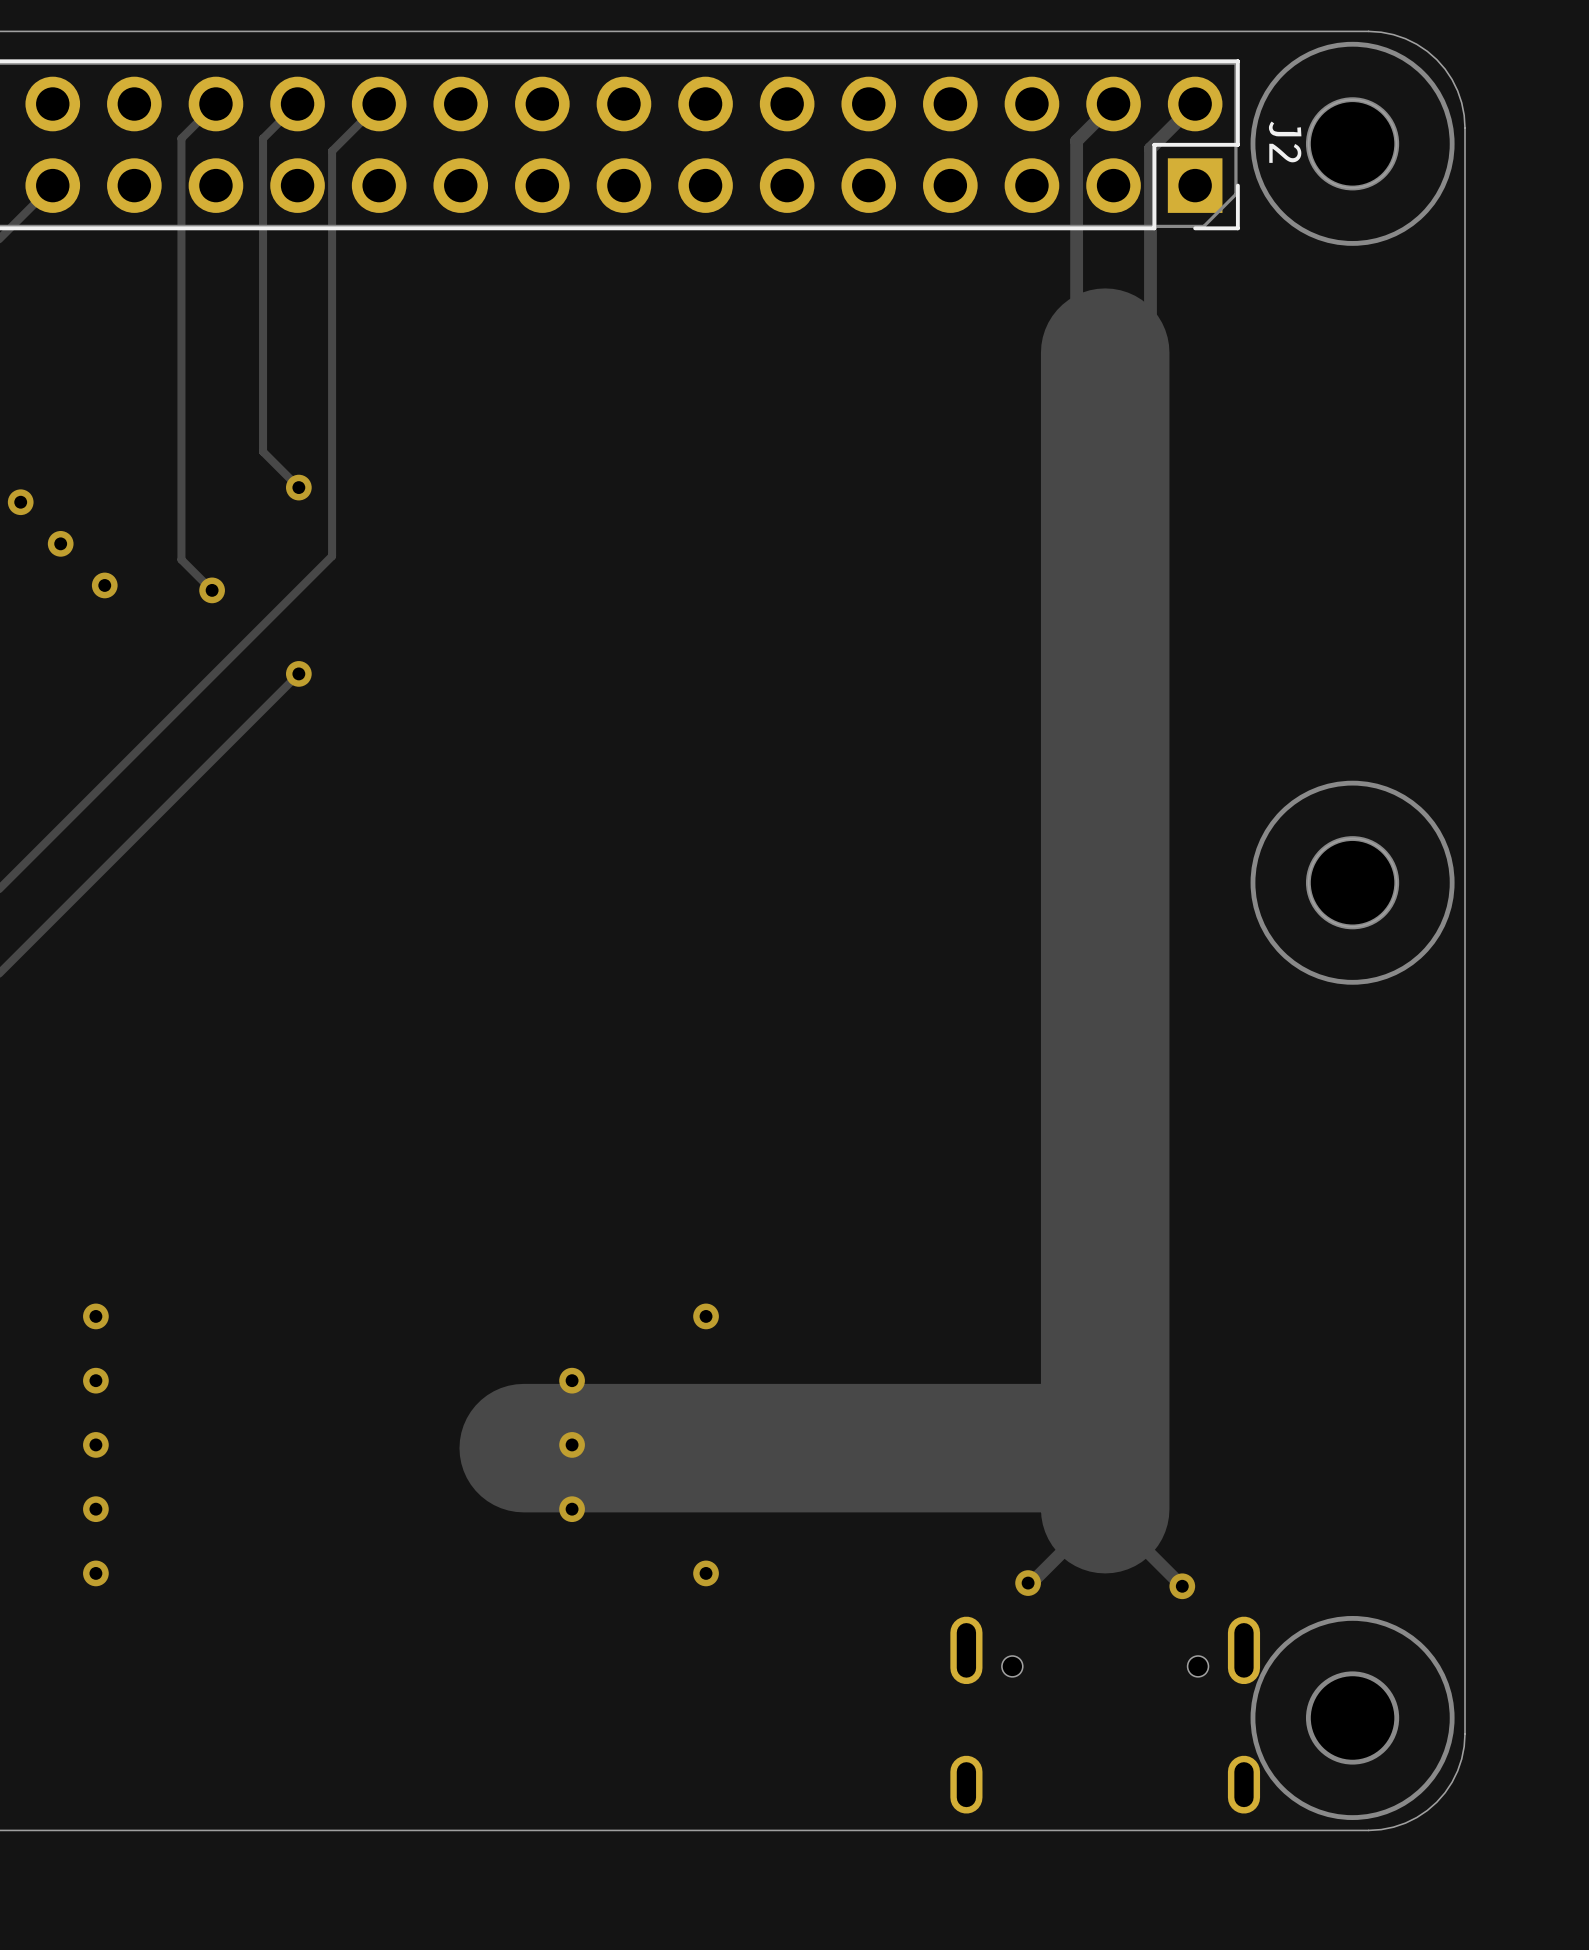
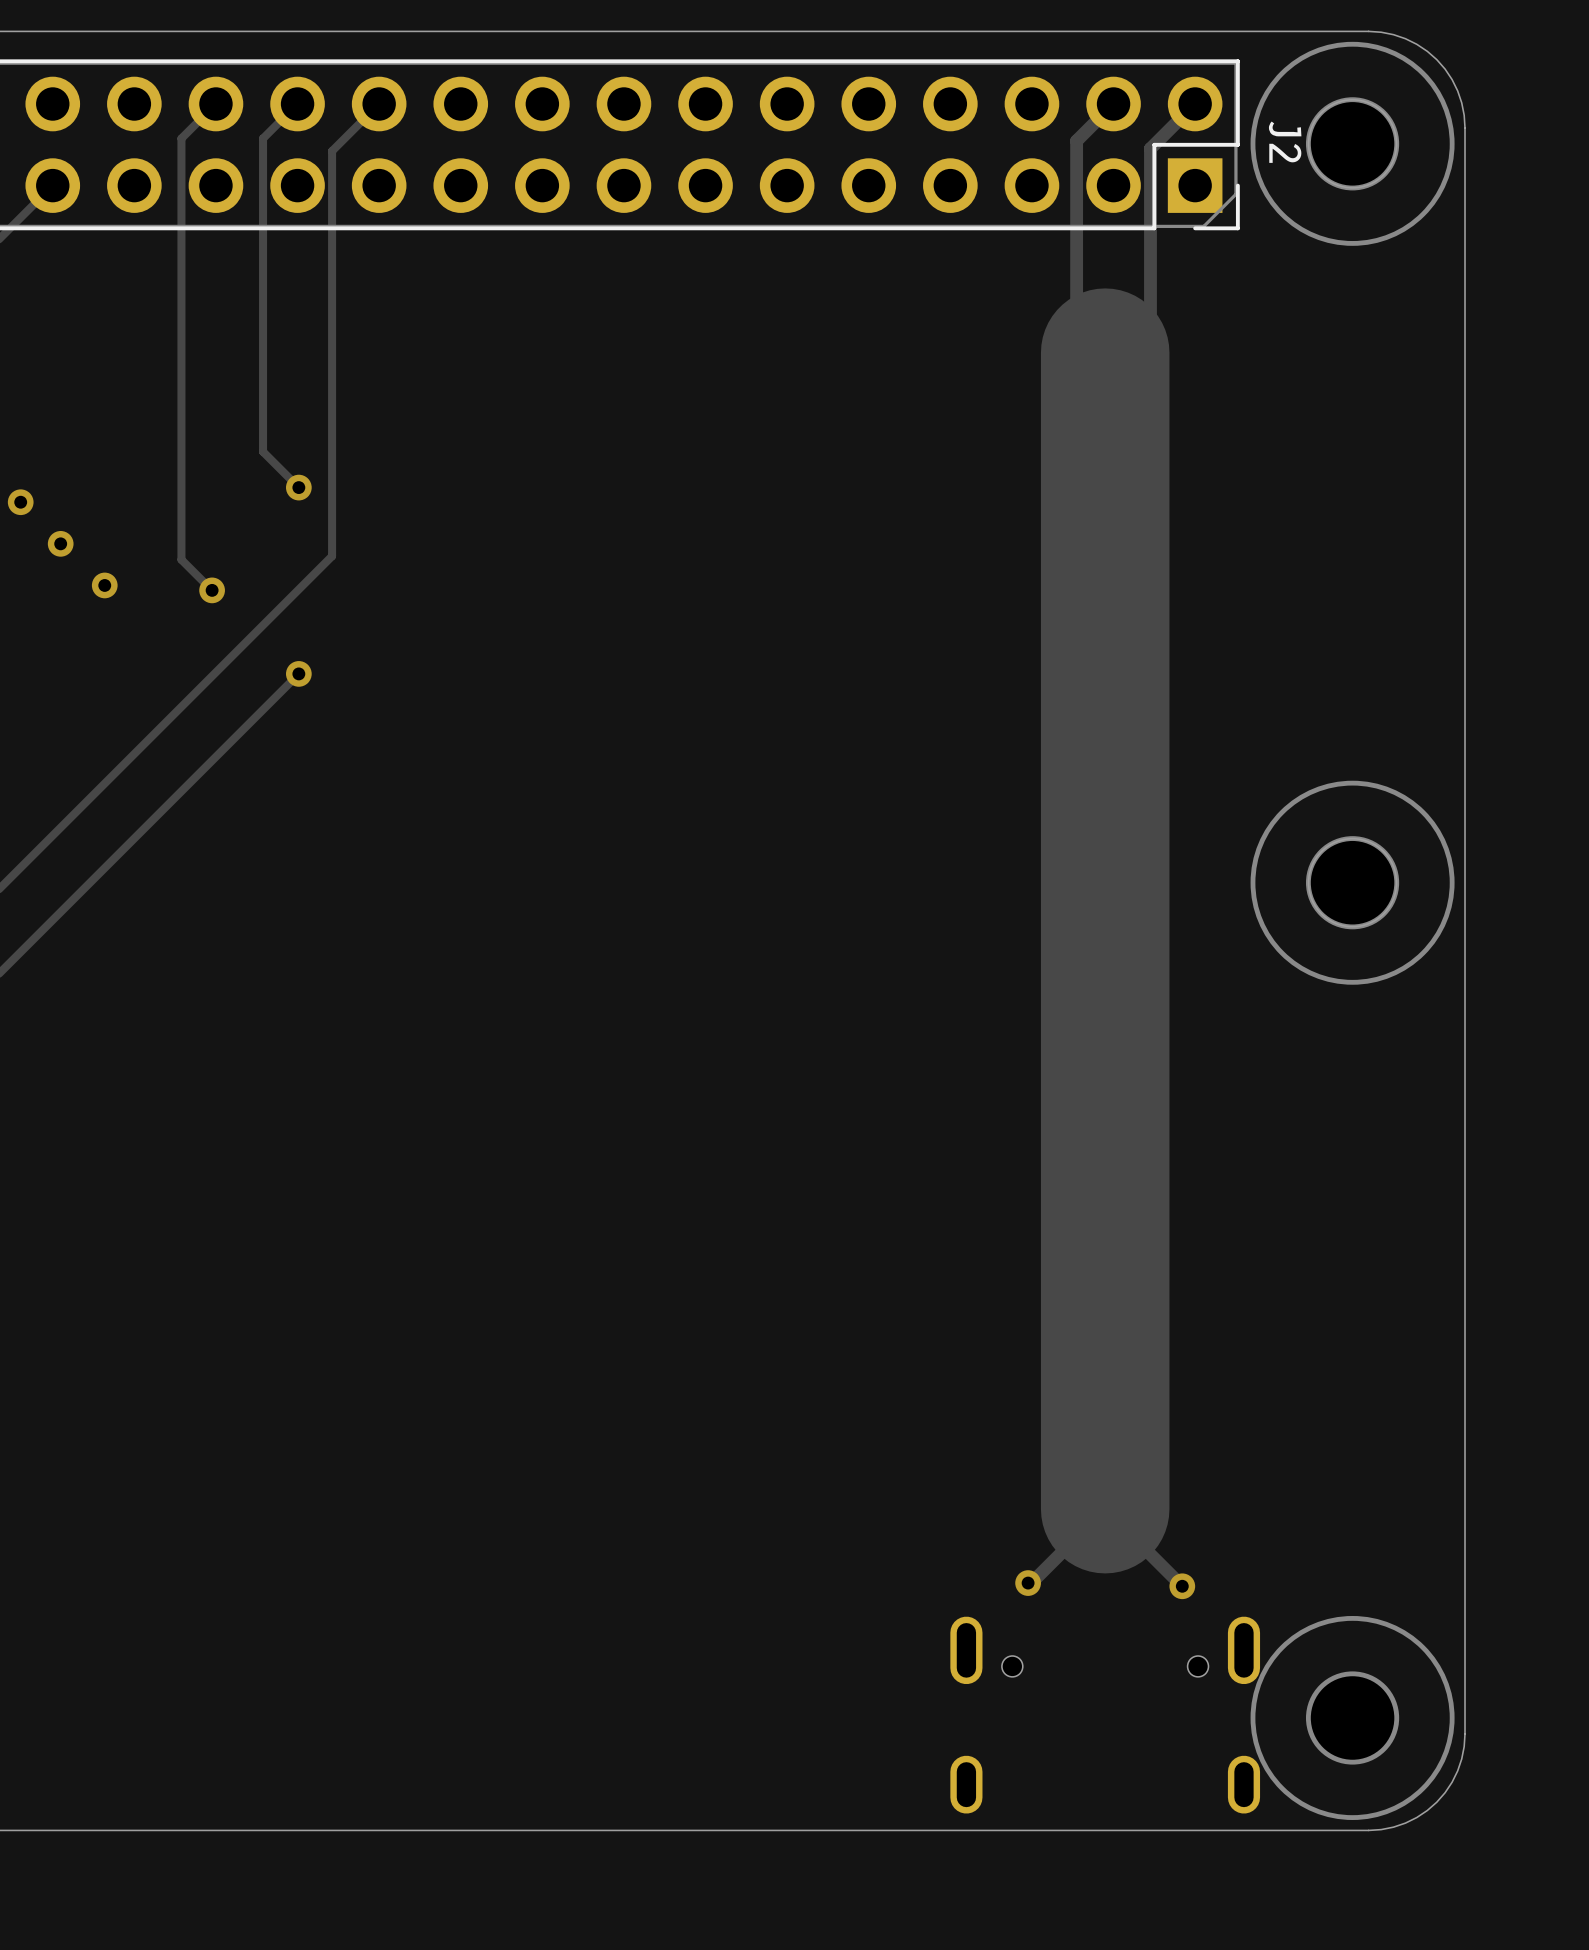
via: (95, 1316) -> none
via: (706, 1316) -> none
via: (95, 1380) -> none
via: (572, 1380) -> none
via: (95, 1444) -> none
track: (572, 1444) (526, 1444) (523, 1448) (1044, 1448) (1105, 1509) -> none
via: (572, 1444) -> none
via: (95, 1509) -> none
via: (572, 1509) -> none
via: (95, 1573) -> none
via: (706, 1573) -> none

